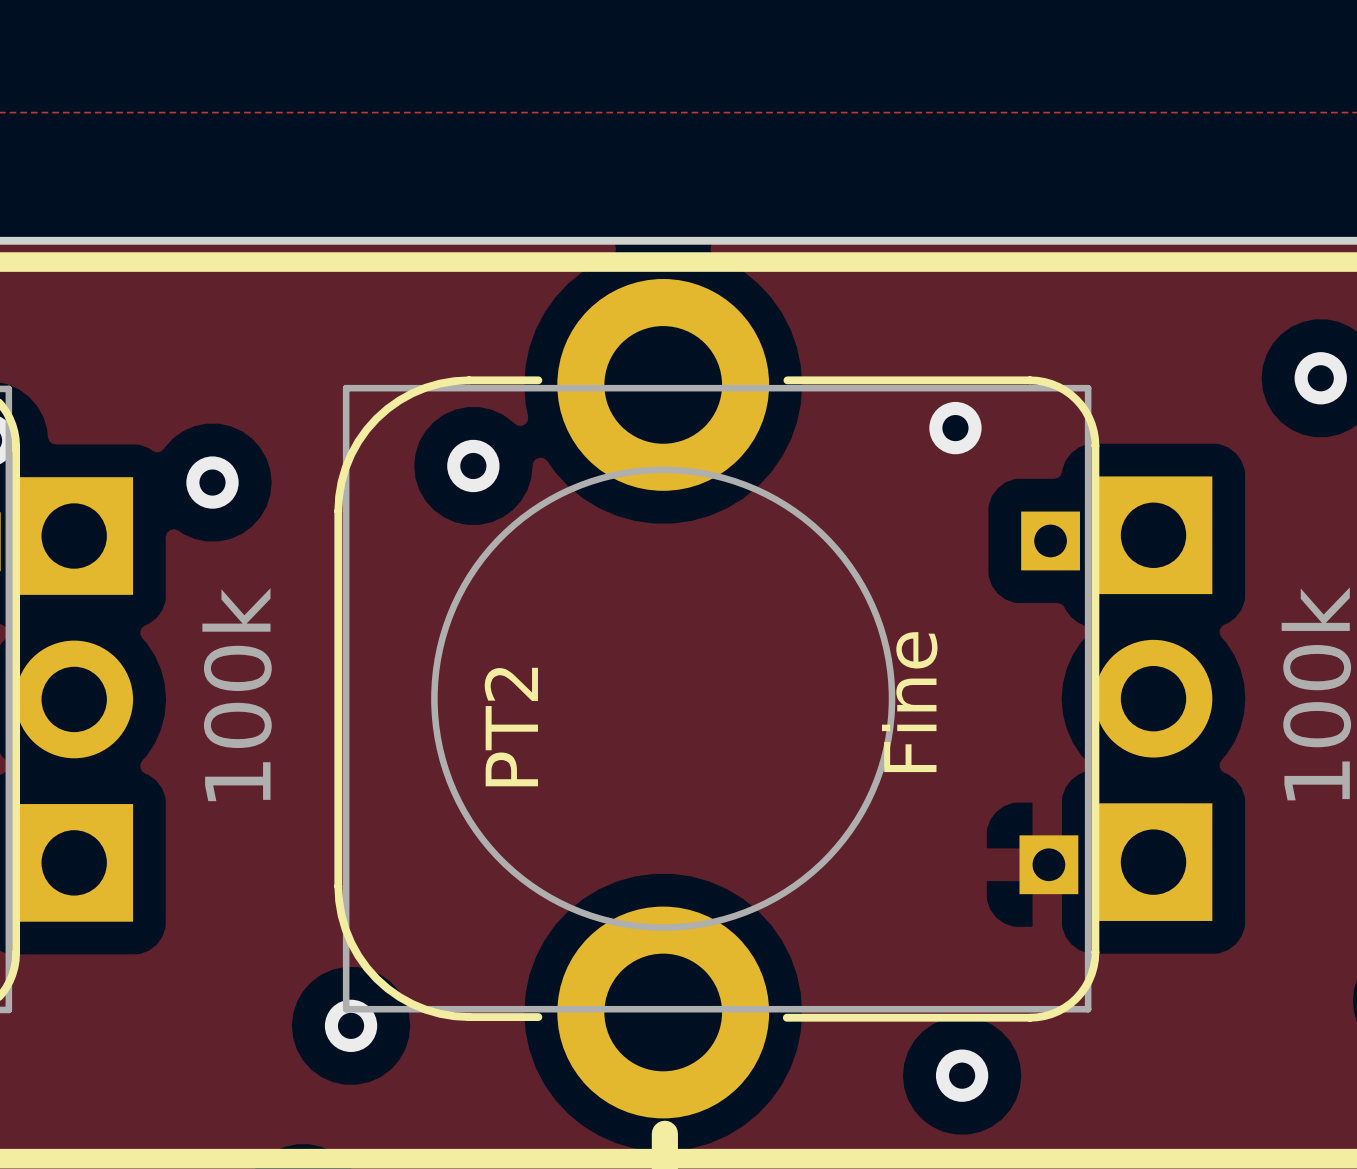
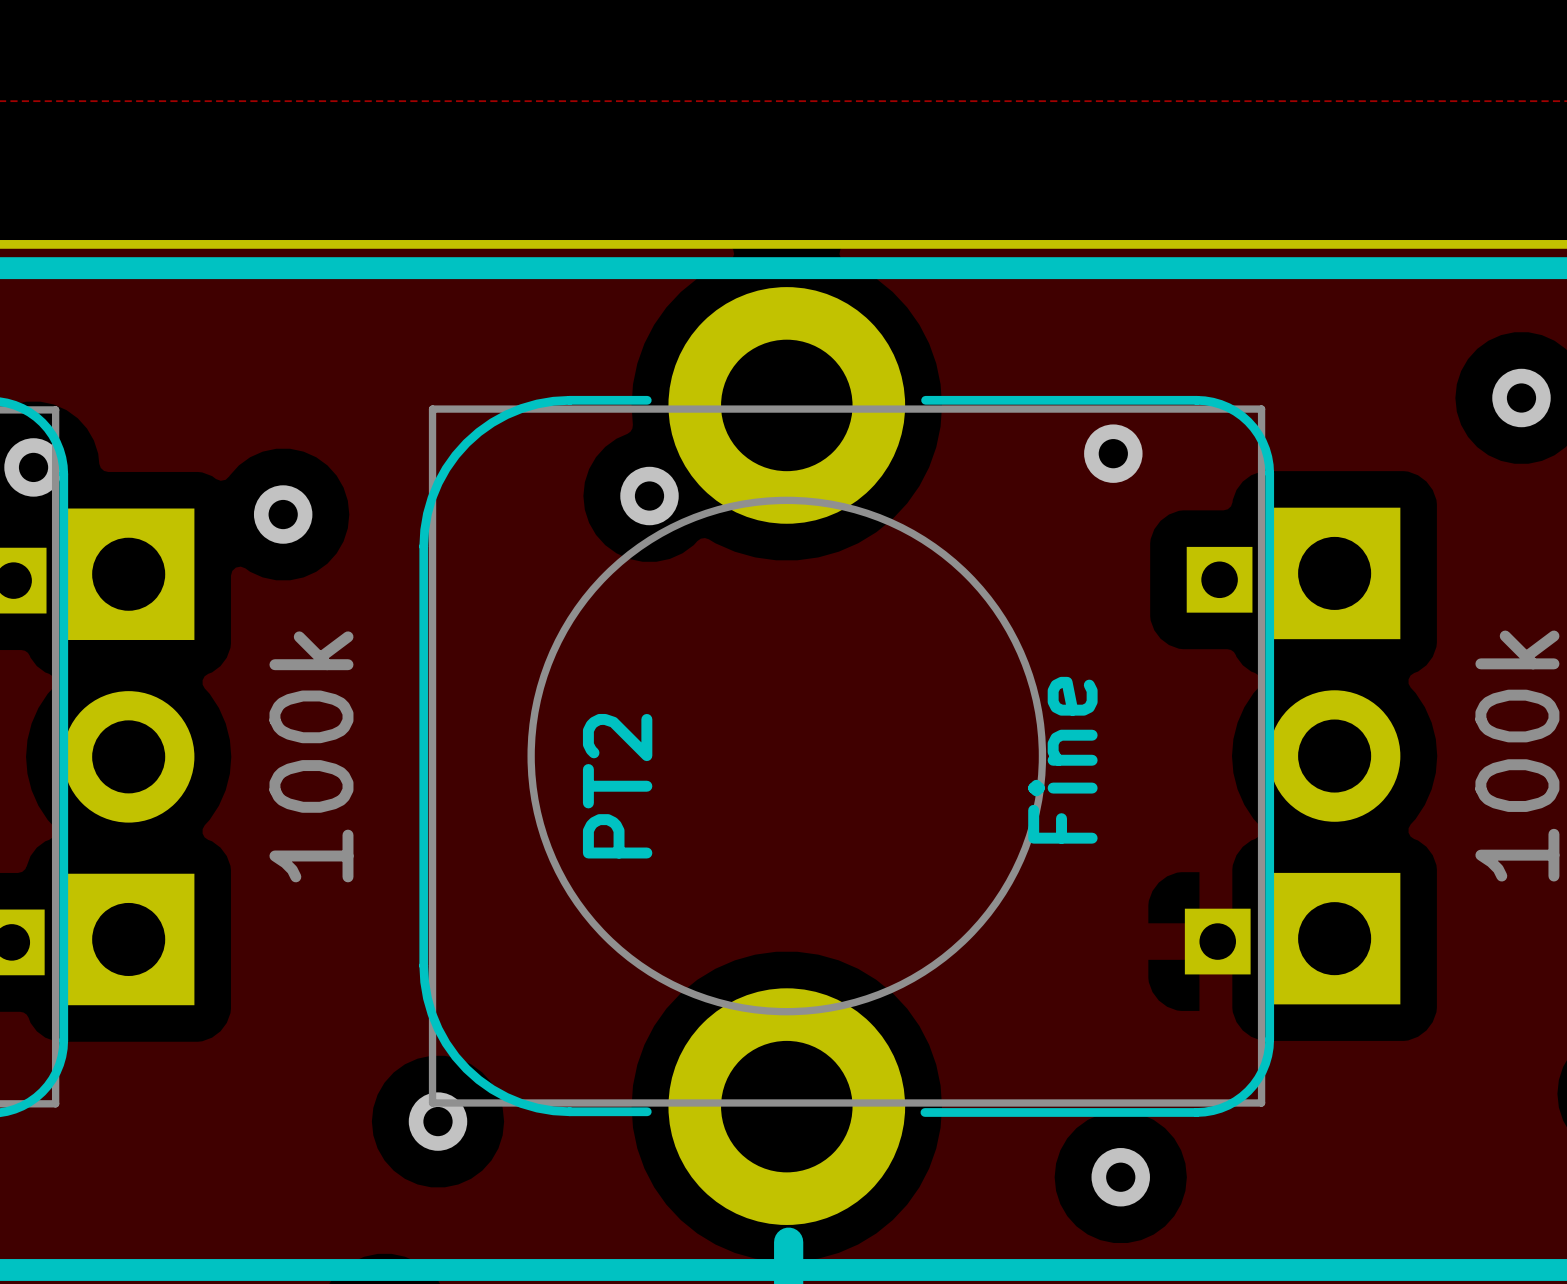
via position: (473, 465) -> (649, 496)

